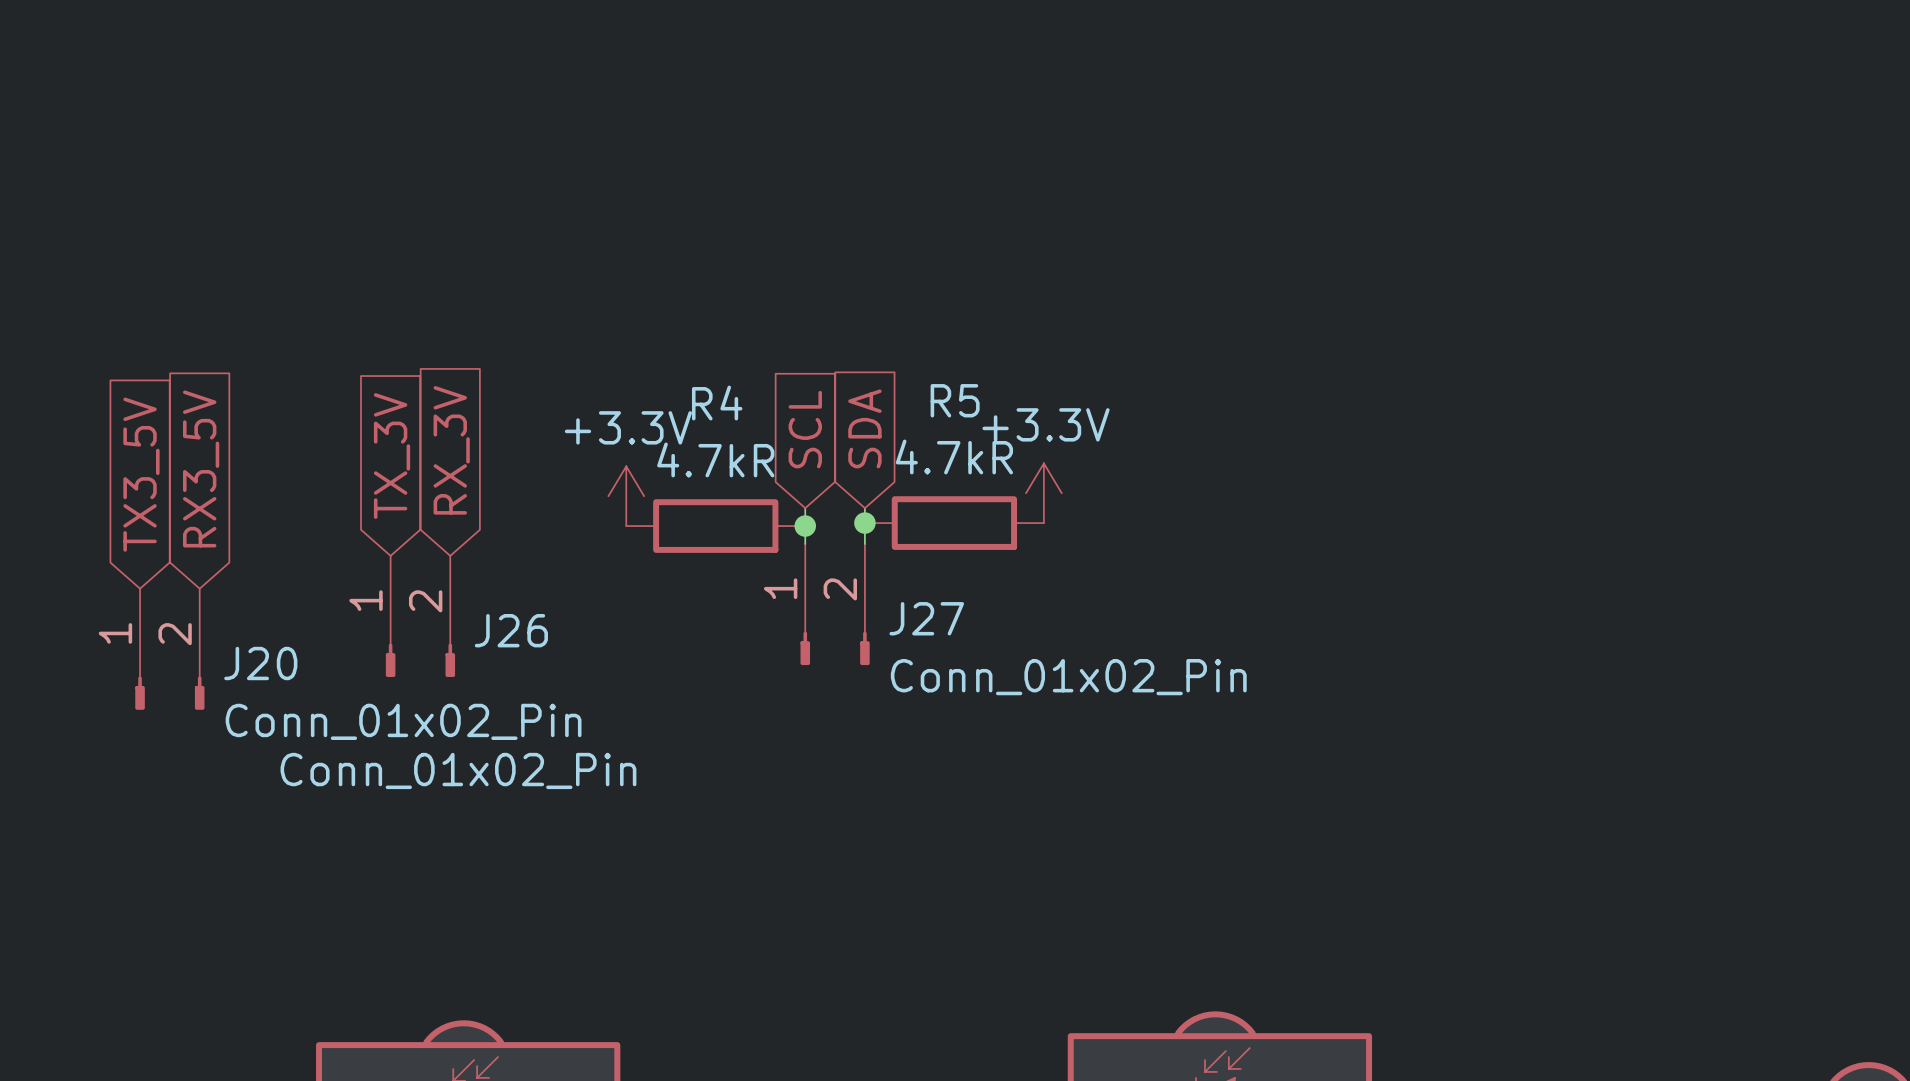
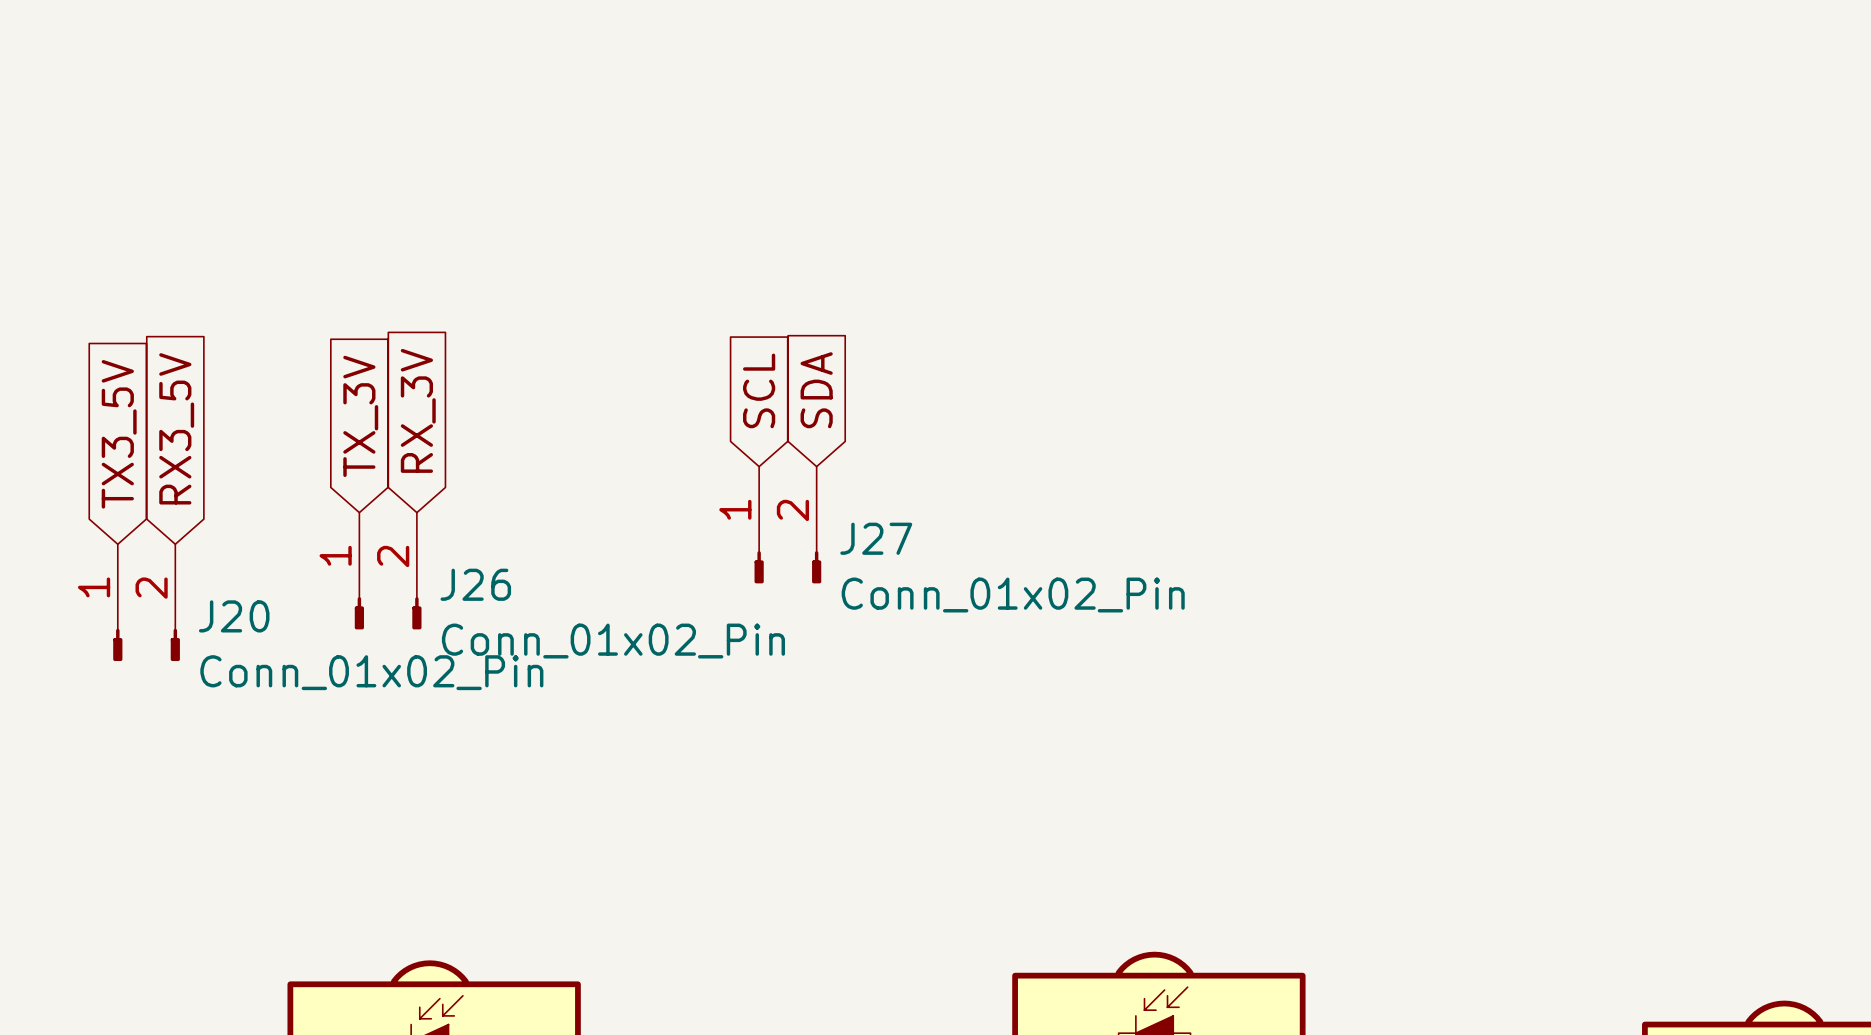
power symbol: +3.3V (1043, 493) -> none
power symbol: +3.3V (626, 496) -> none
junction: (864, 523) -> none
R5: 4.7kR (954, 523) -> none
R4: 4.7kR (715, 526) -> none
junction: (805, 526) -> none
J27 position: (835, 604) -> (787, 525)
J26 value position: Conn_01x02_Pin (458, 770) -> Conn_01x02_Pin (613, 641)

